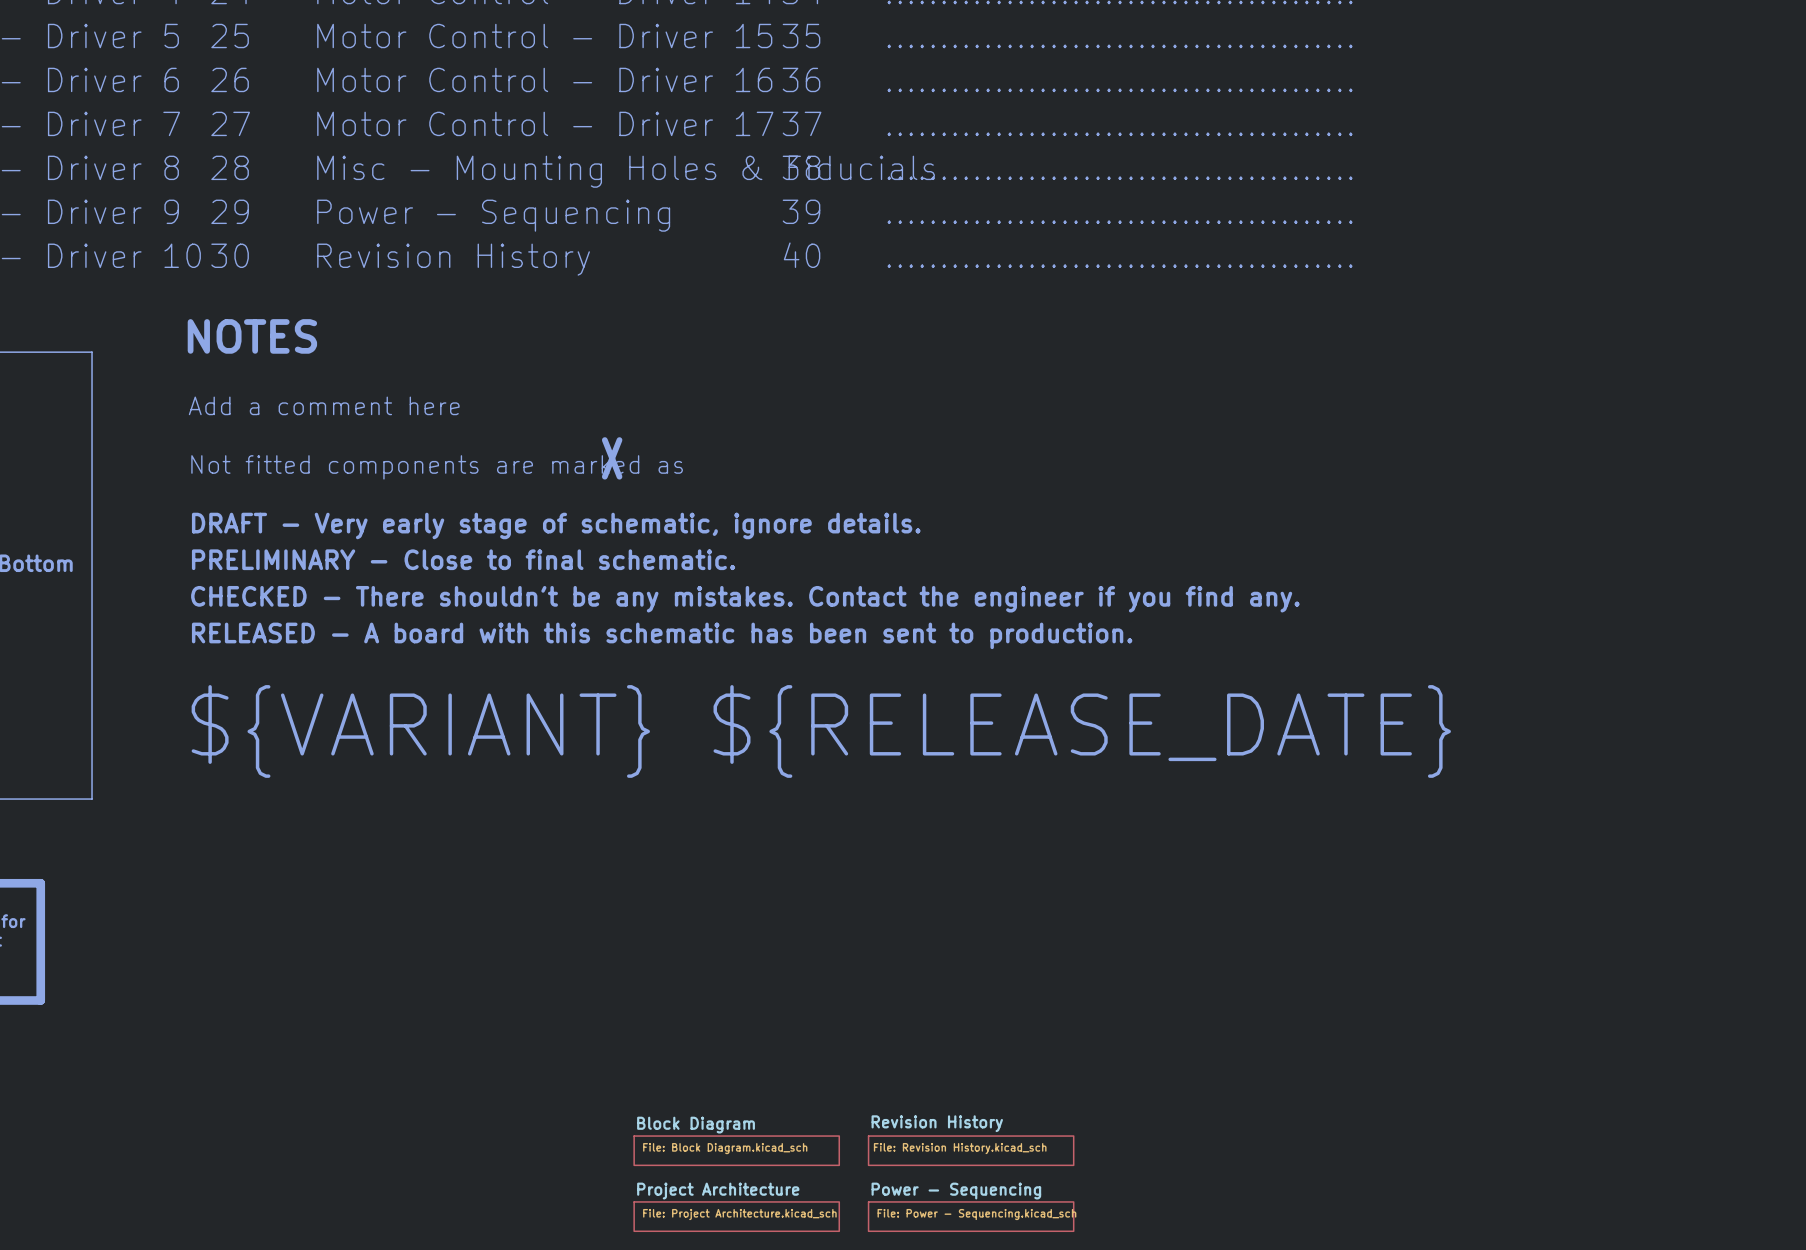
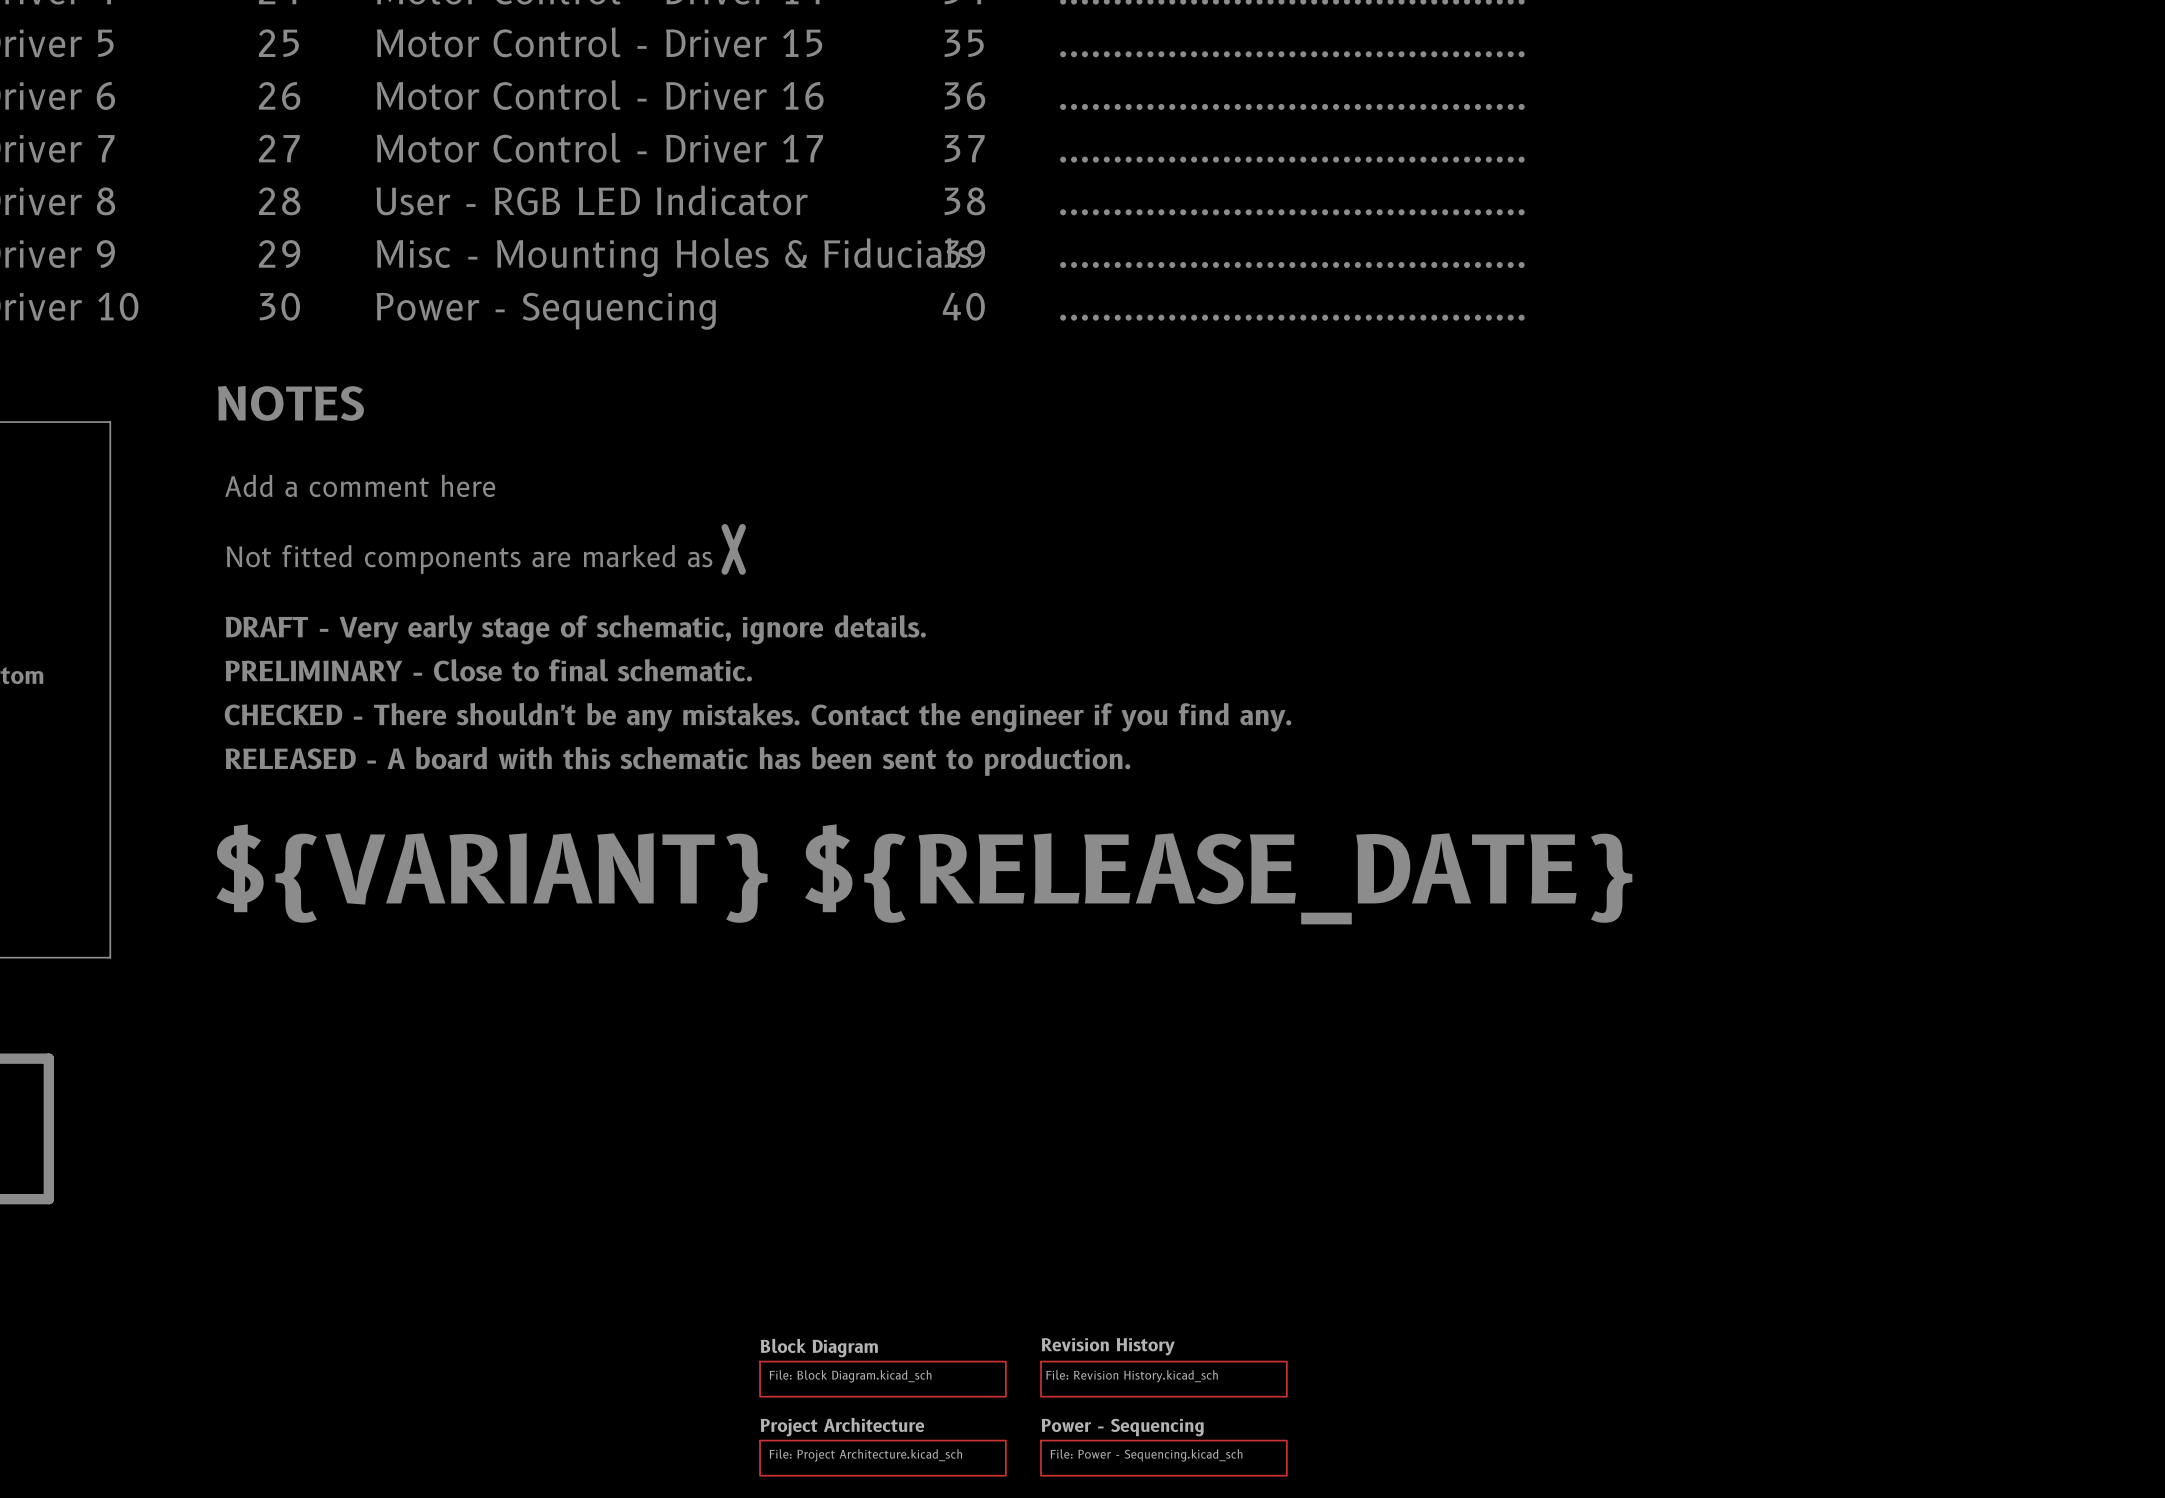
text: Misc - Mounting Holes & Fiducials (626, 171) -> User - RGB LED Indicator (592, 200)
text: Power - Sequencing (493, 215) -> Misc - Mounting Holes & Fiducials (674, 257)
text: Revision History (453, 259) -> Power - Sequencing (546, 311)

